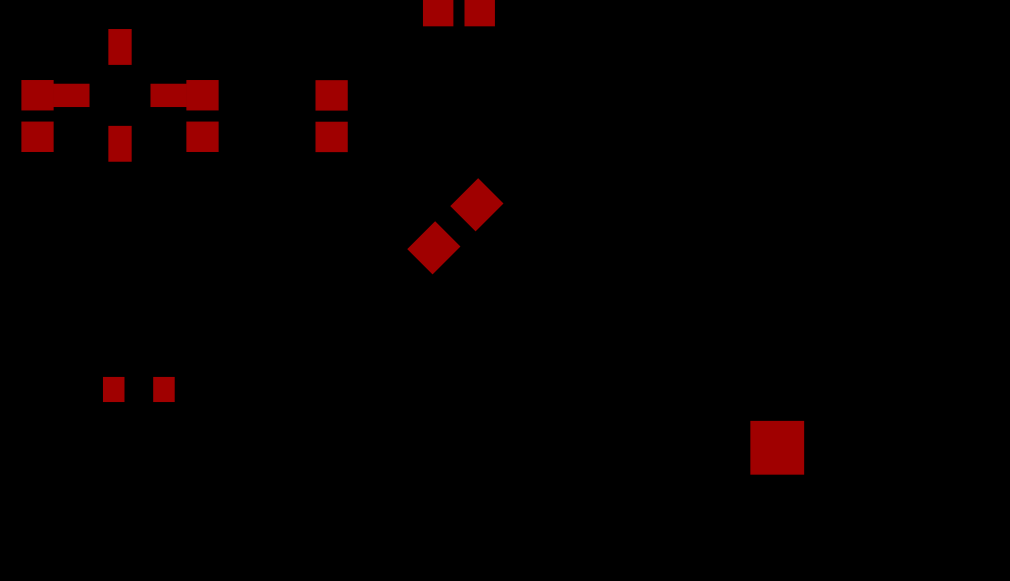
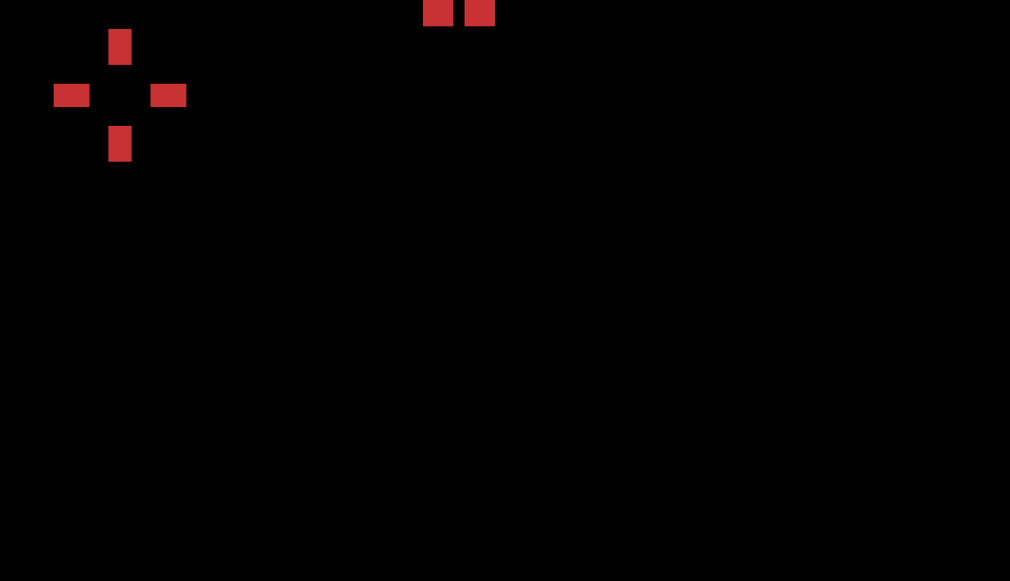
part: (37, 116) -> none
part: (202, 116) -> none
part: (331, 116) -> none
part: (455, 226) -> none
part: (138, 389) -> none
part: (777, 447) -> none

